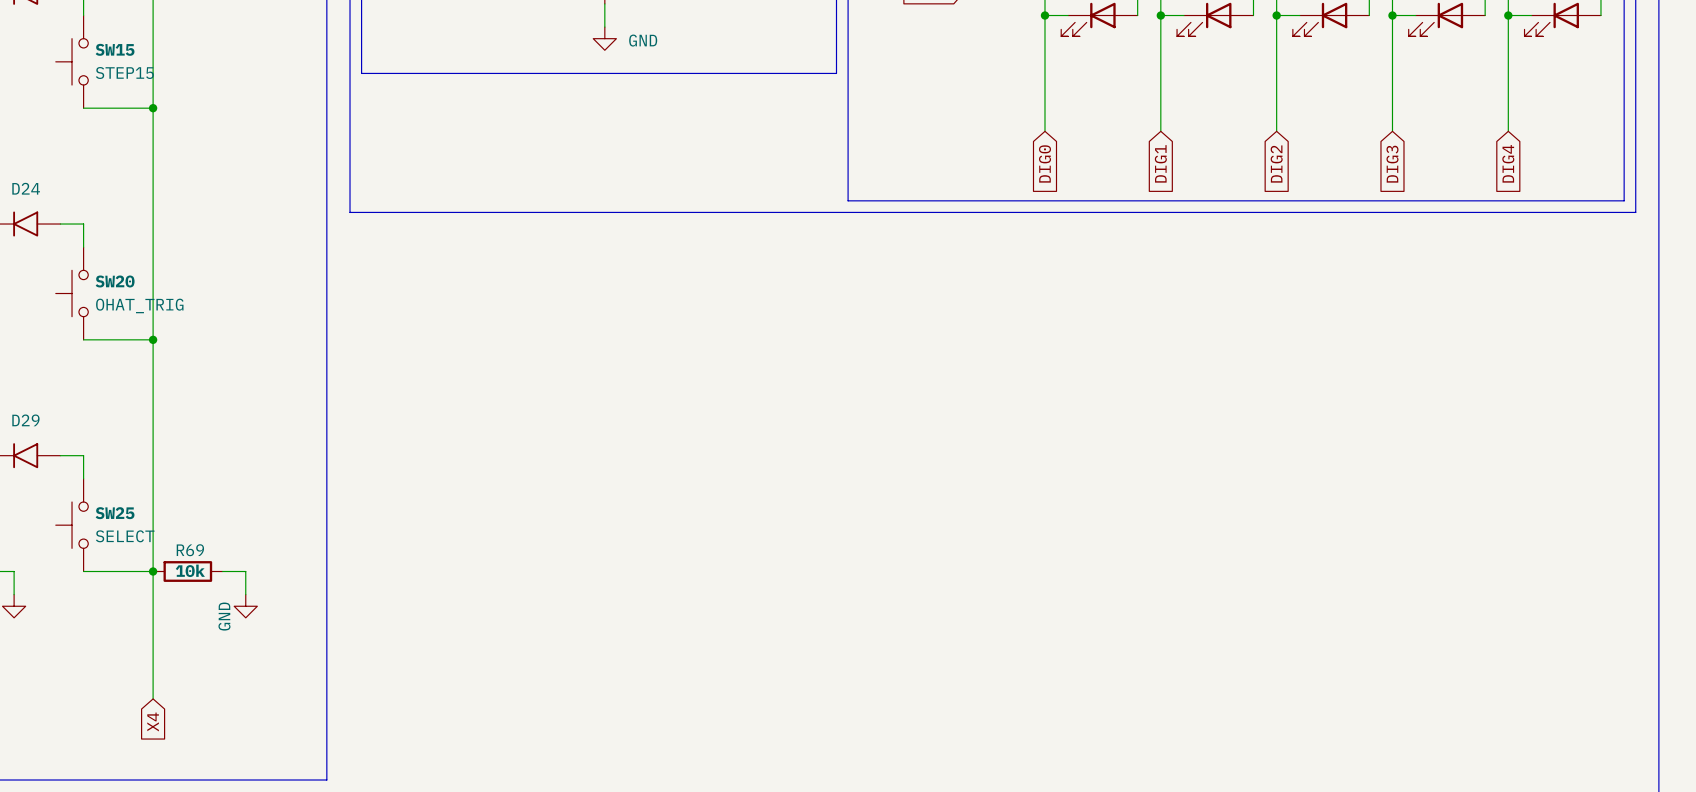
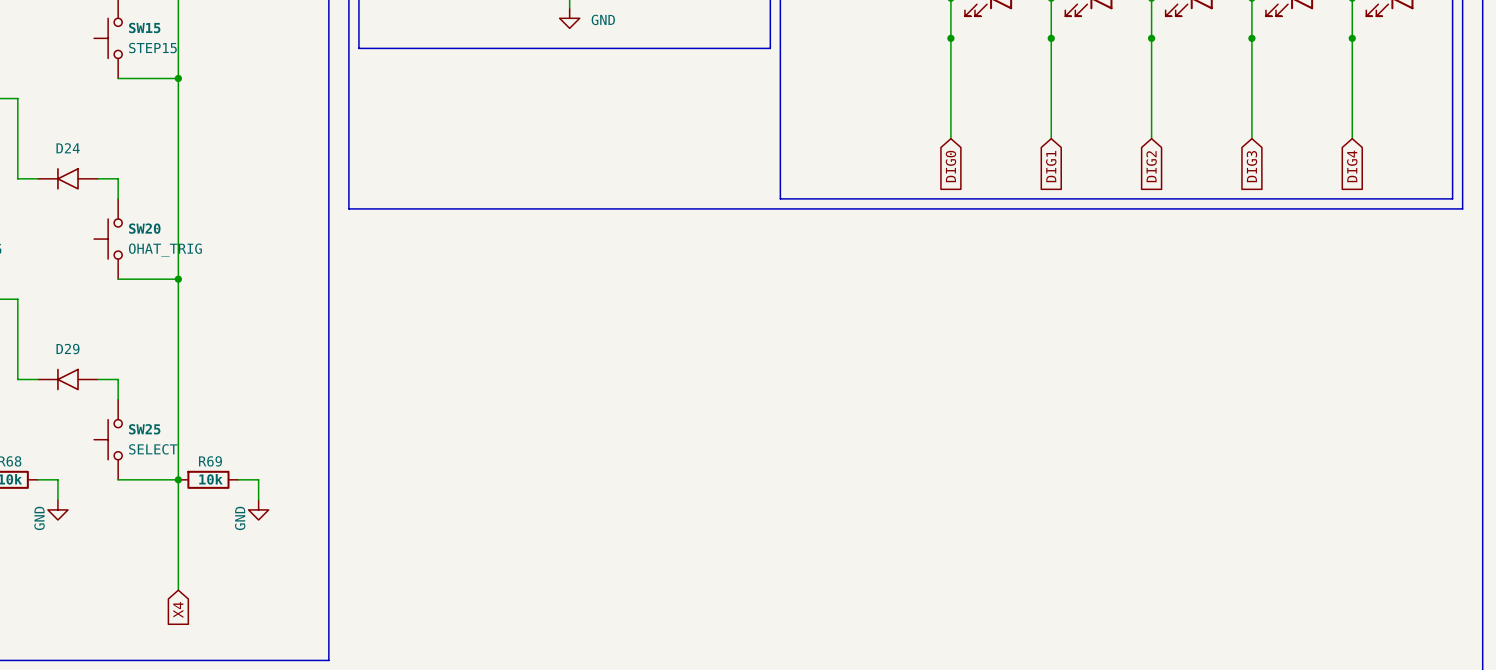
junction: none -> (950, 38)
junction: none -> (1051, 38)
junction: none -> (1151, 38)
junction: none -> (1251, 38)
junction: none -> (1352, 38)
wire: none -> (950, 98) (950, 138)
wire: none -> (1051, 98) (1051, 138)
wire: none -> (1151, 98) (1151, 138)
wire: none -> (1251, 98) (1251, 138)
wire: none -> (1352, 98) (1352, 138)
global label position: DIG0 (1044, 163) -> DIG0 (950, 166)
global label position: DIG1 (1160, 163) -> DIG1 (1051, 166)
global label position: DIG4 (1508, 163) -> DIG4 (1352, 166)
global label position: DIG2 (1276, 164) -> DIG2 (1151, 166)
global label position: DIG3 (1392, 164) -> DIG3 (1251, 166)
line: (848, 200) (1624, 200) -> (780, 158) (780, 198) (1452, 198) (1452, 158)
line: (350, 212) (1635, 212) -> (348, 168) (348, 208) (1462, 208) (1462, 168)

